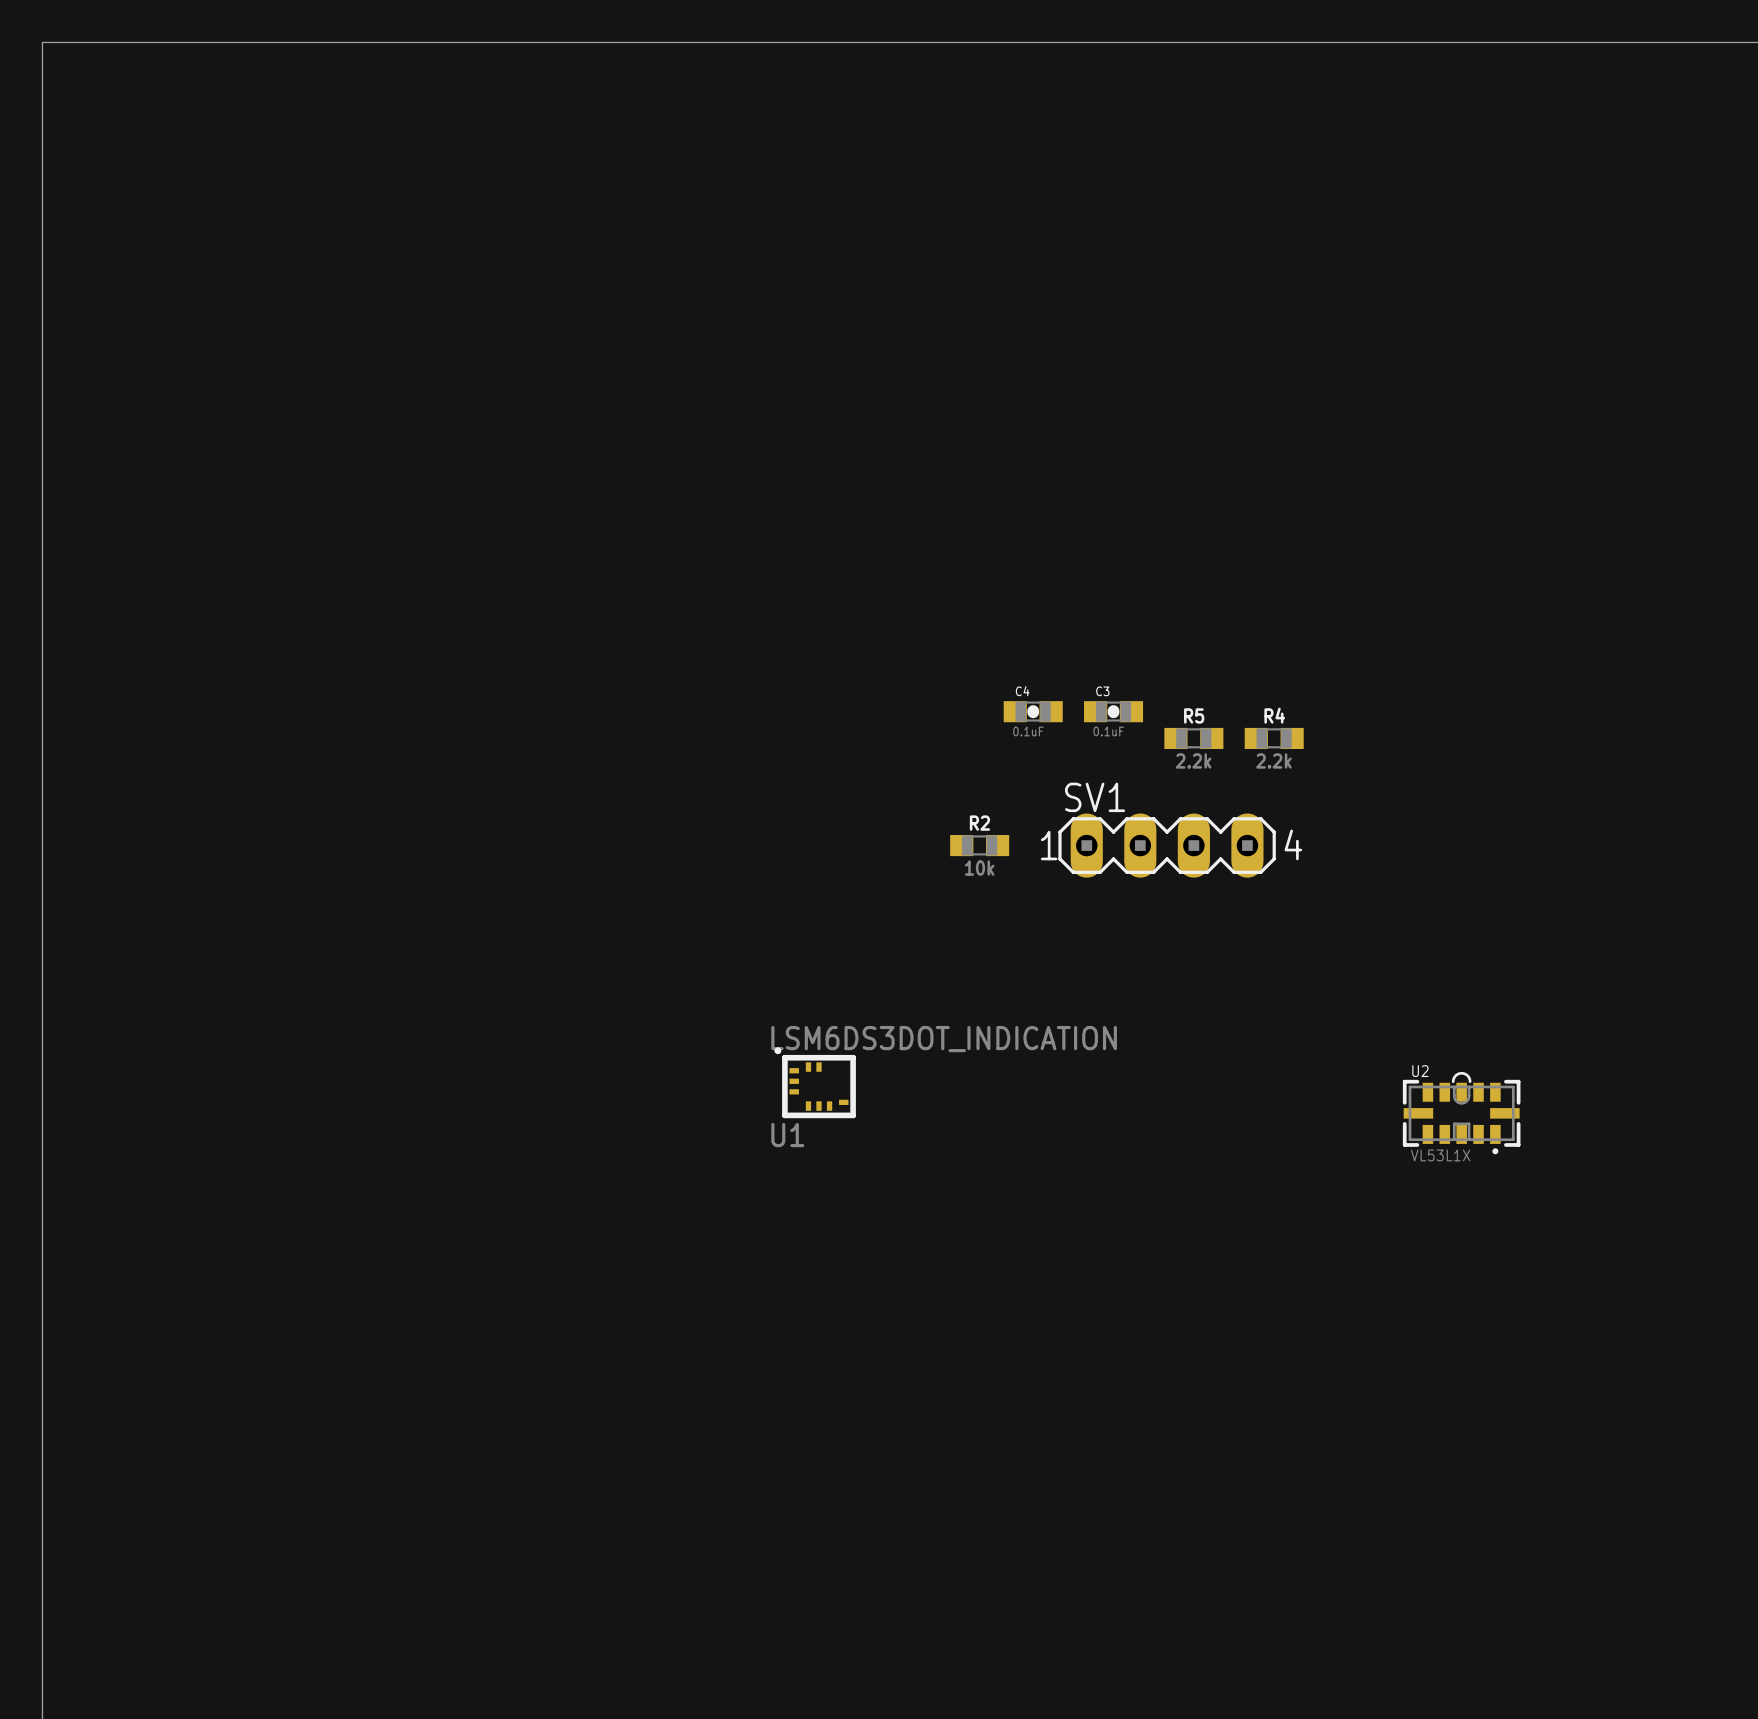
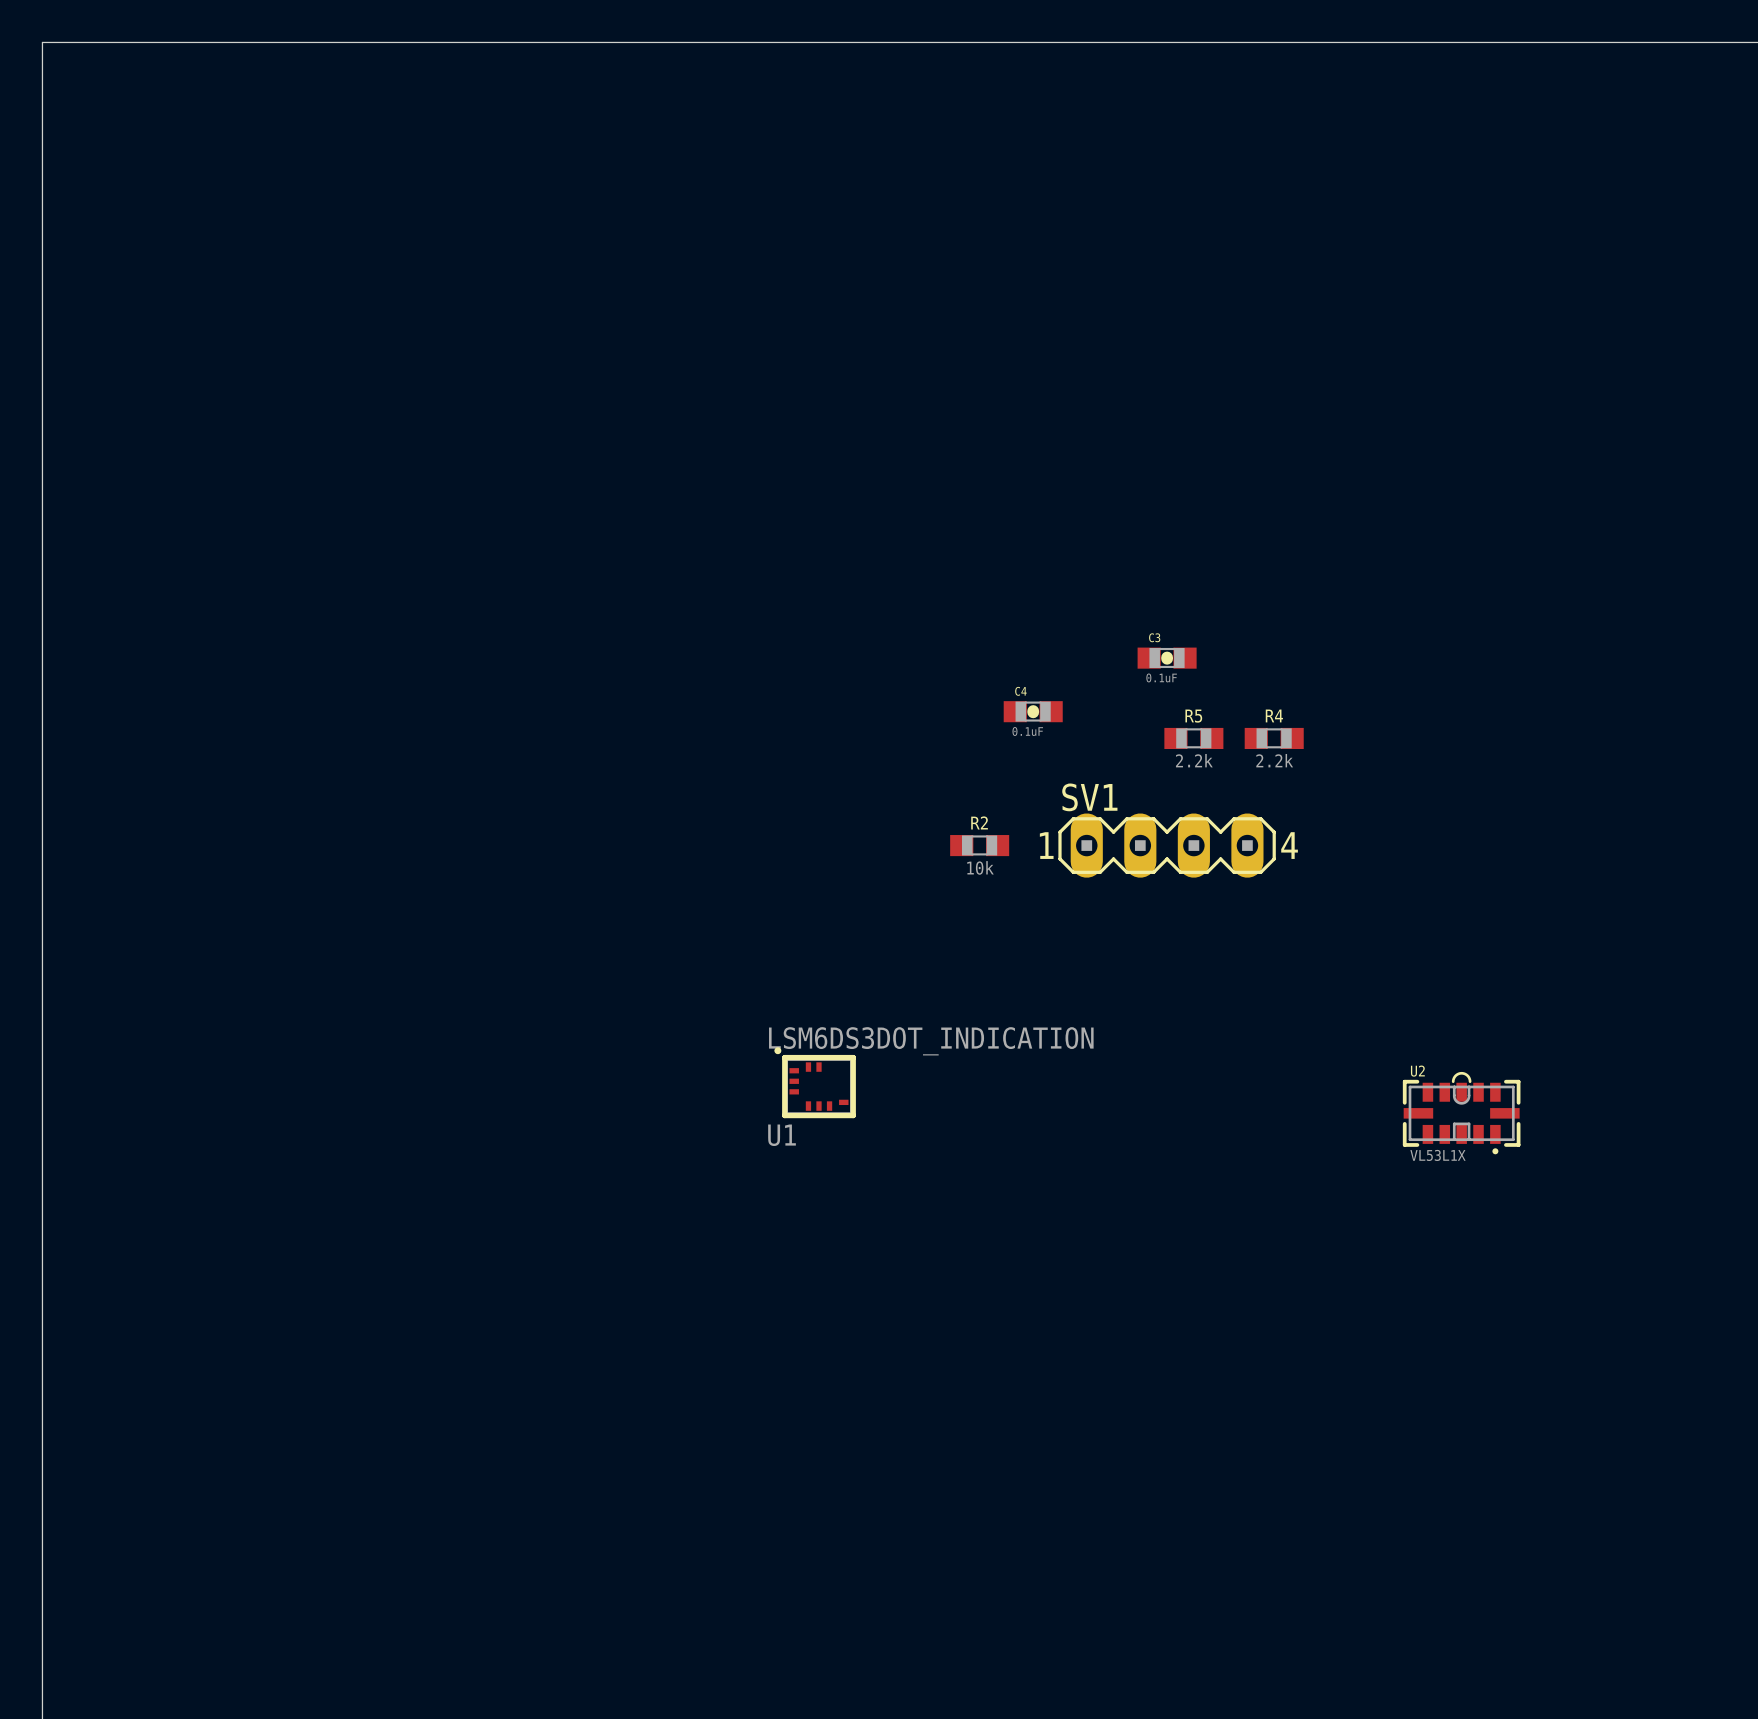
C3 position: (1113, 711) -> (1167, 658)

